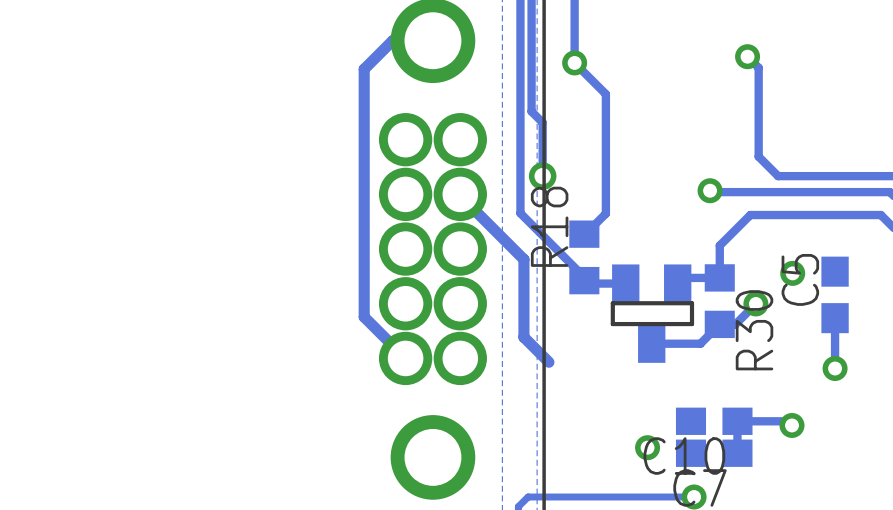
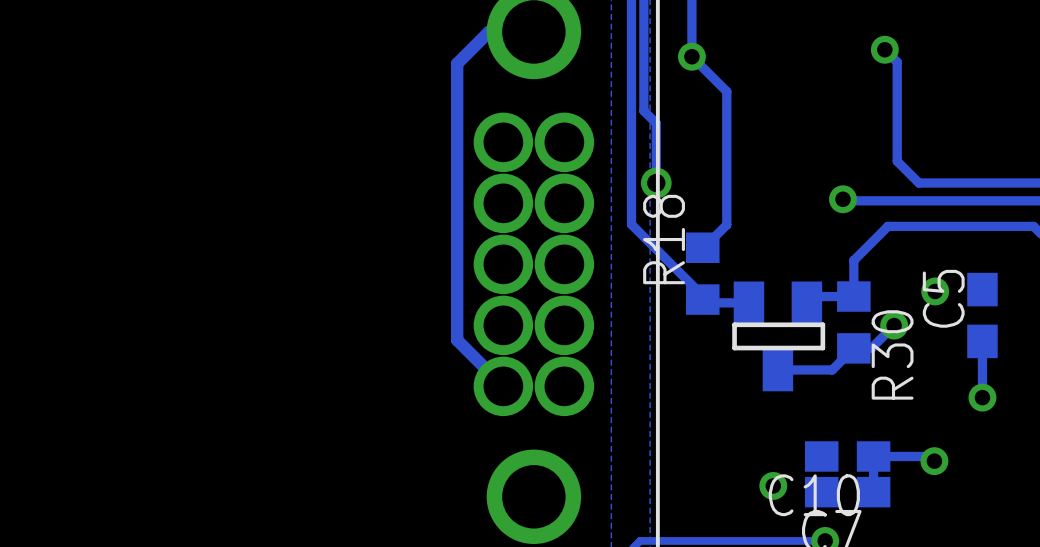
track: (460, 194) (523, 259) (523, 337) (548, 362) -> none

